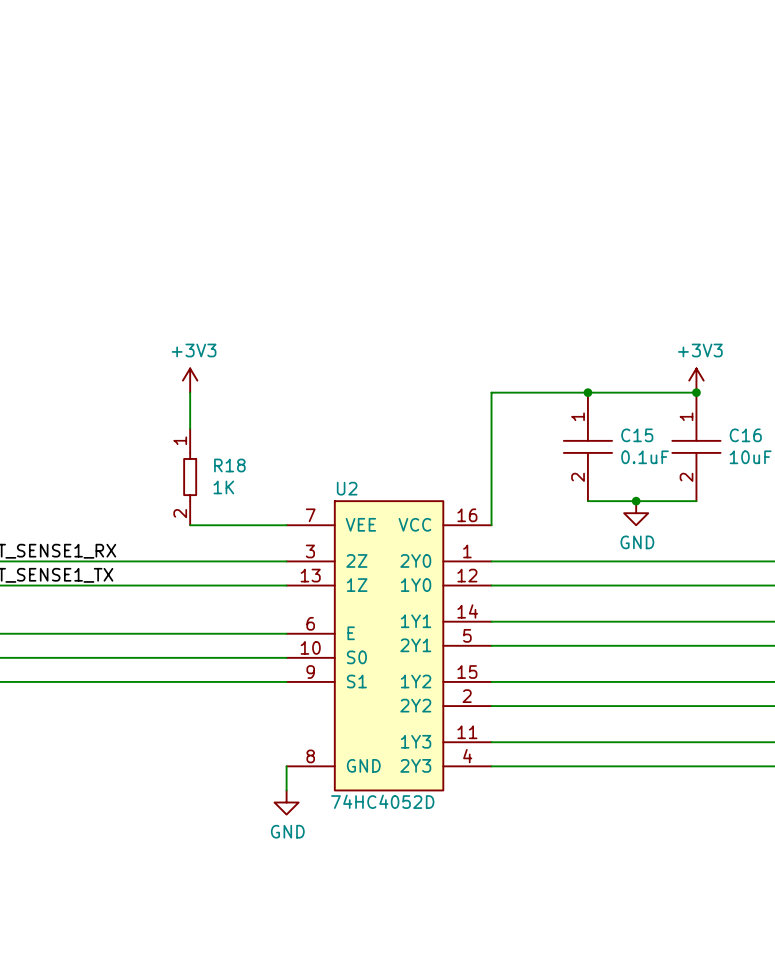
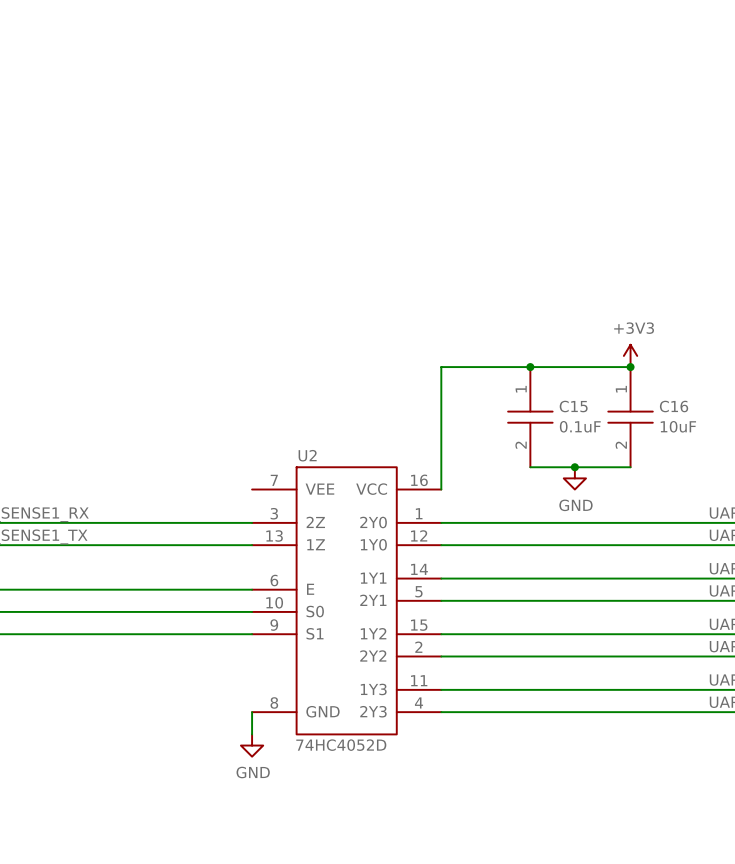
power symbol: +3V3 (190, 380) -> none
wire: (190, 392) (190, 428) -> none
R18: (190, 477) -> none
wire: (190, 525) (286, 525) -> none

